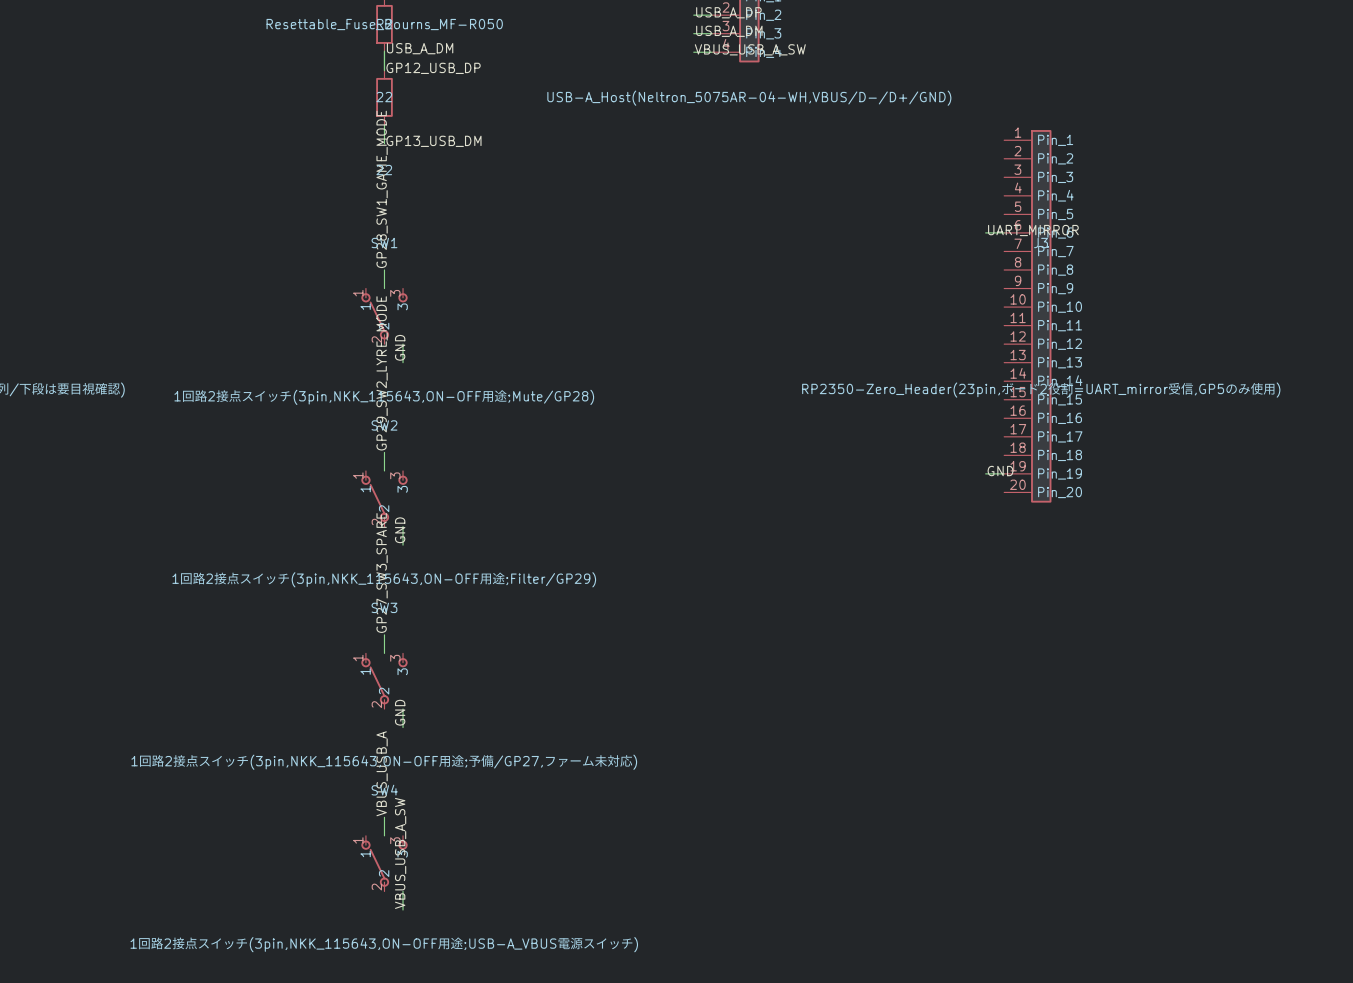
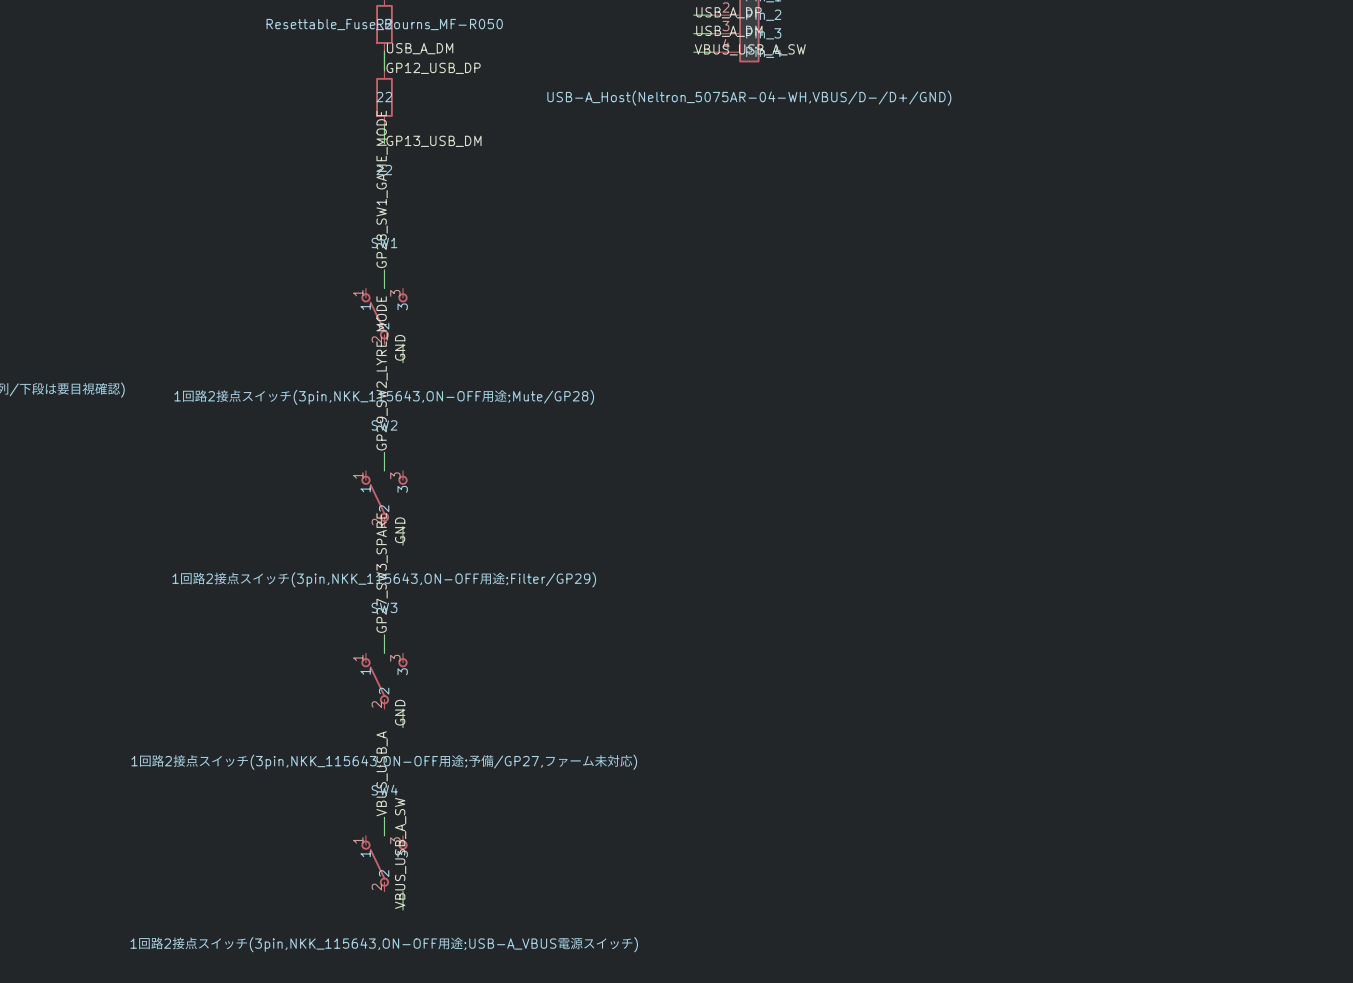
label: UART_MIRROR (1033, 230) -> none
wire: (985, 232) (1004, 232) -> none
J3: RP2350-Zero_Header(23pin,ボード2役割=UART_mirror受信,GP5のみ使用) (1027, 316) -> none
label: GND (1000, 471) -> none
wire: (985, 473) (1004, 473) -> none

